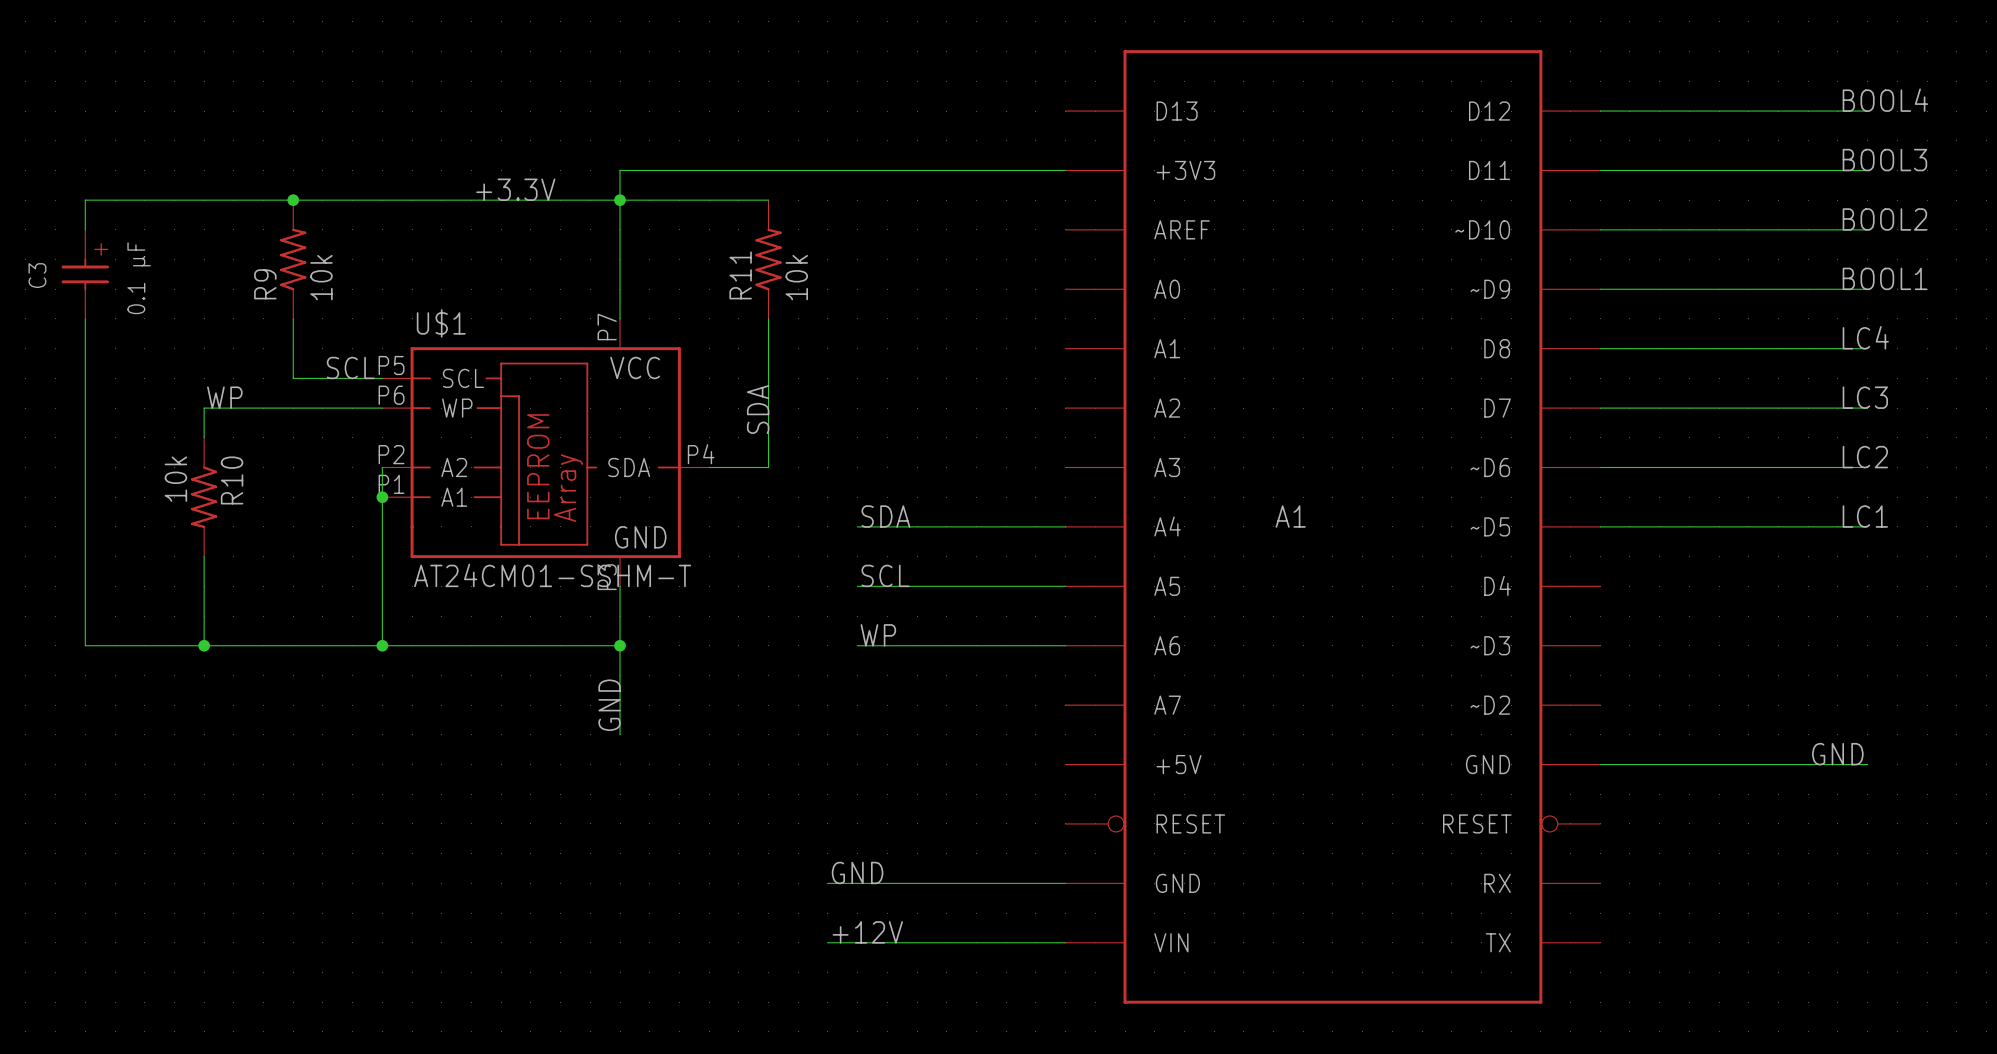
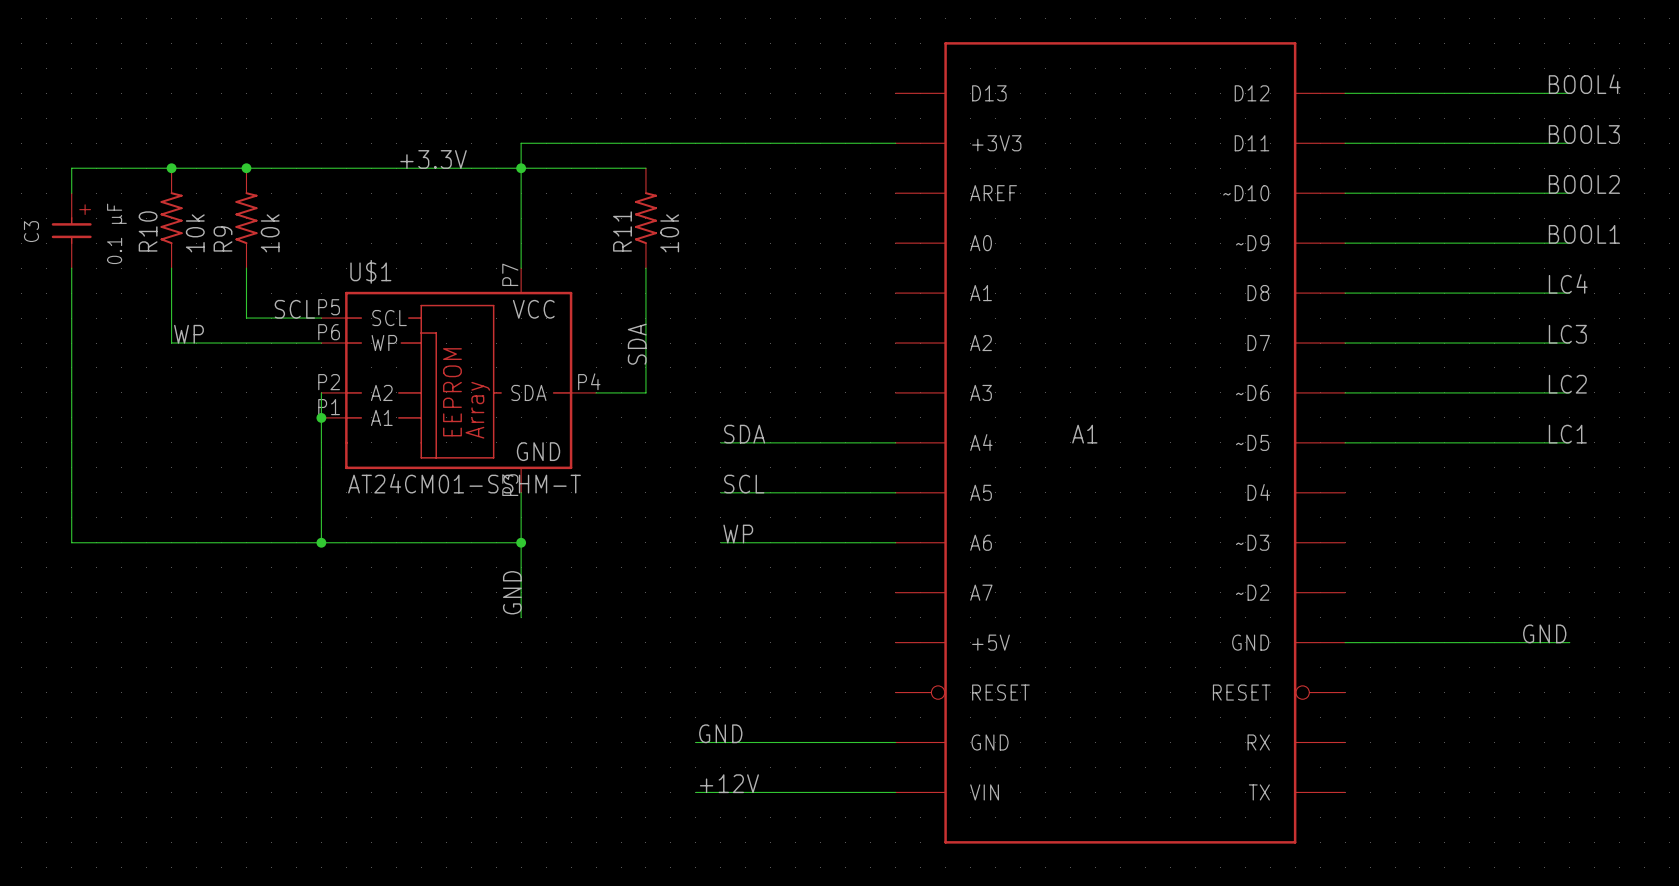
junction: none -> (171, 168)
wire: (204, 408) (204, 437) -> (171, 343) (171, 268)
R10 rotation: 0° (204, 497) -> 180° (171, 218)
R10 position: (204, 497) -> (171, 218)
wire: (204, 556) (204, 645) -> none
junction: (204, 645) -> none

